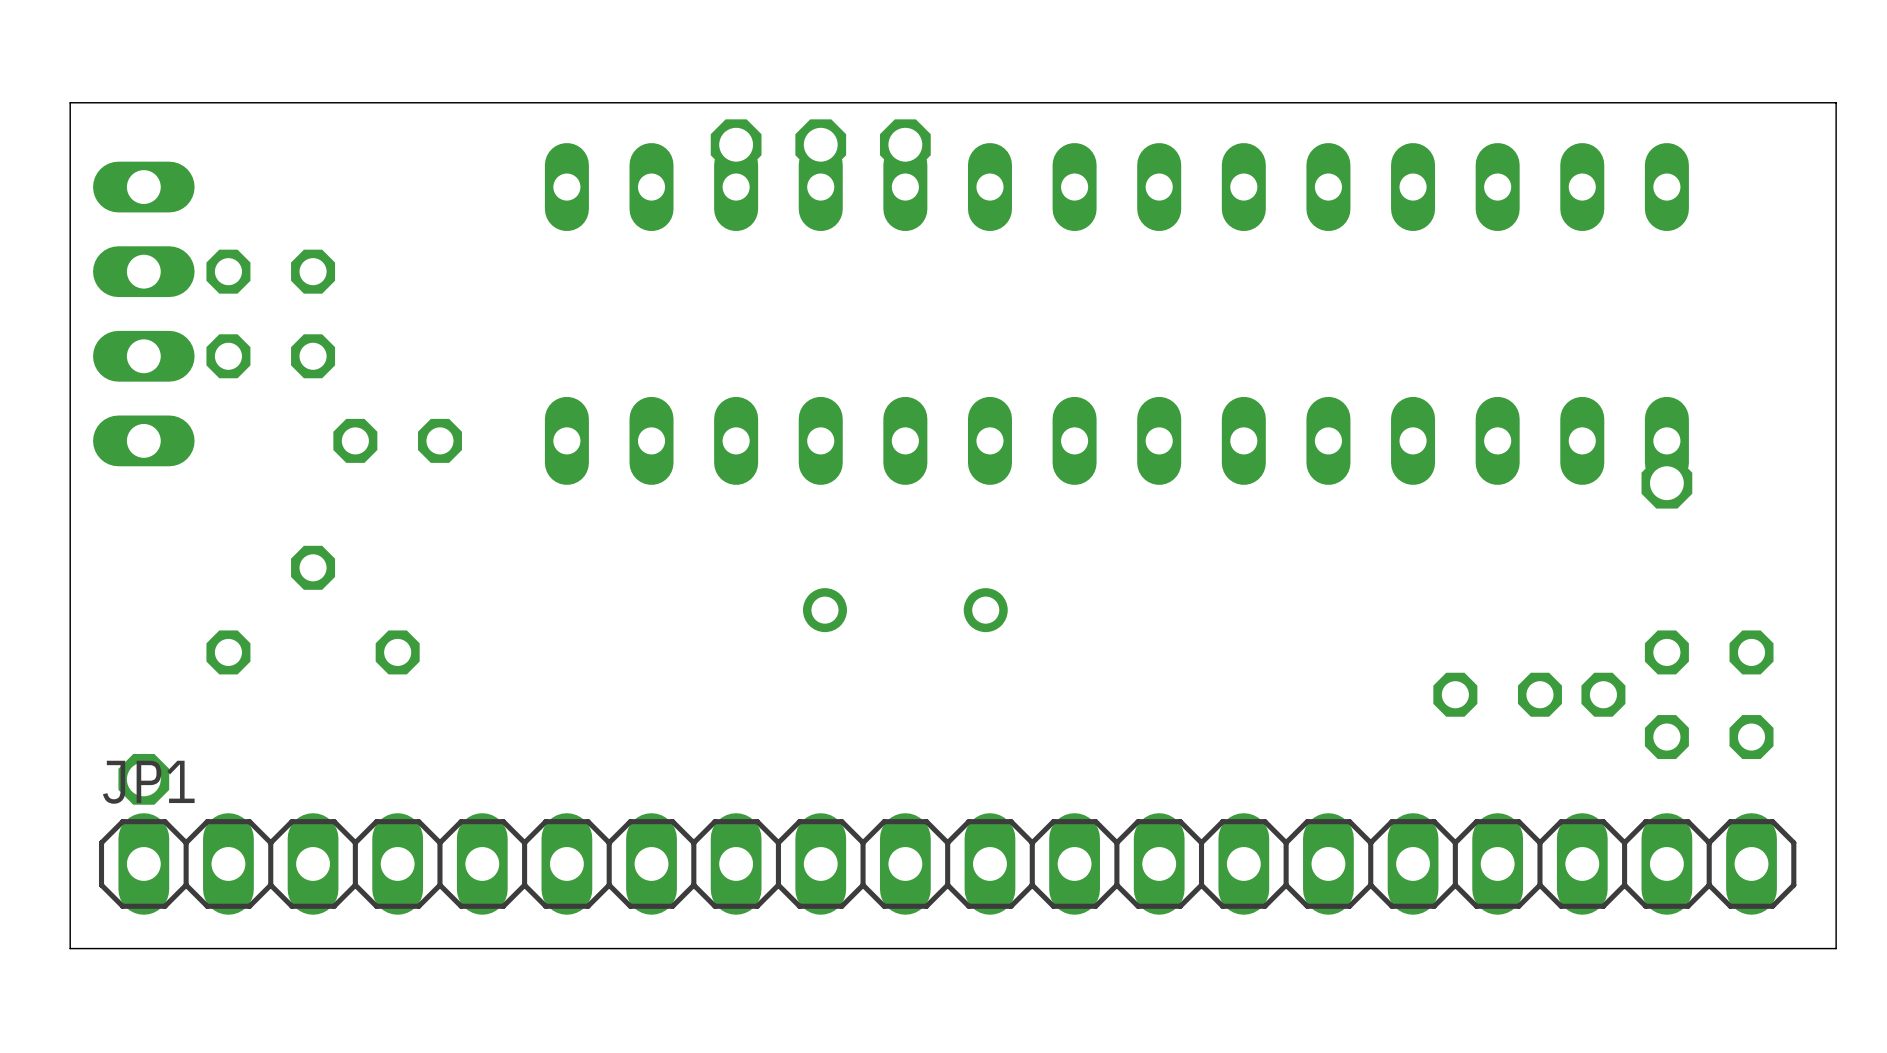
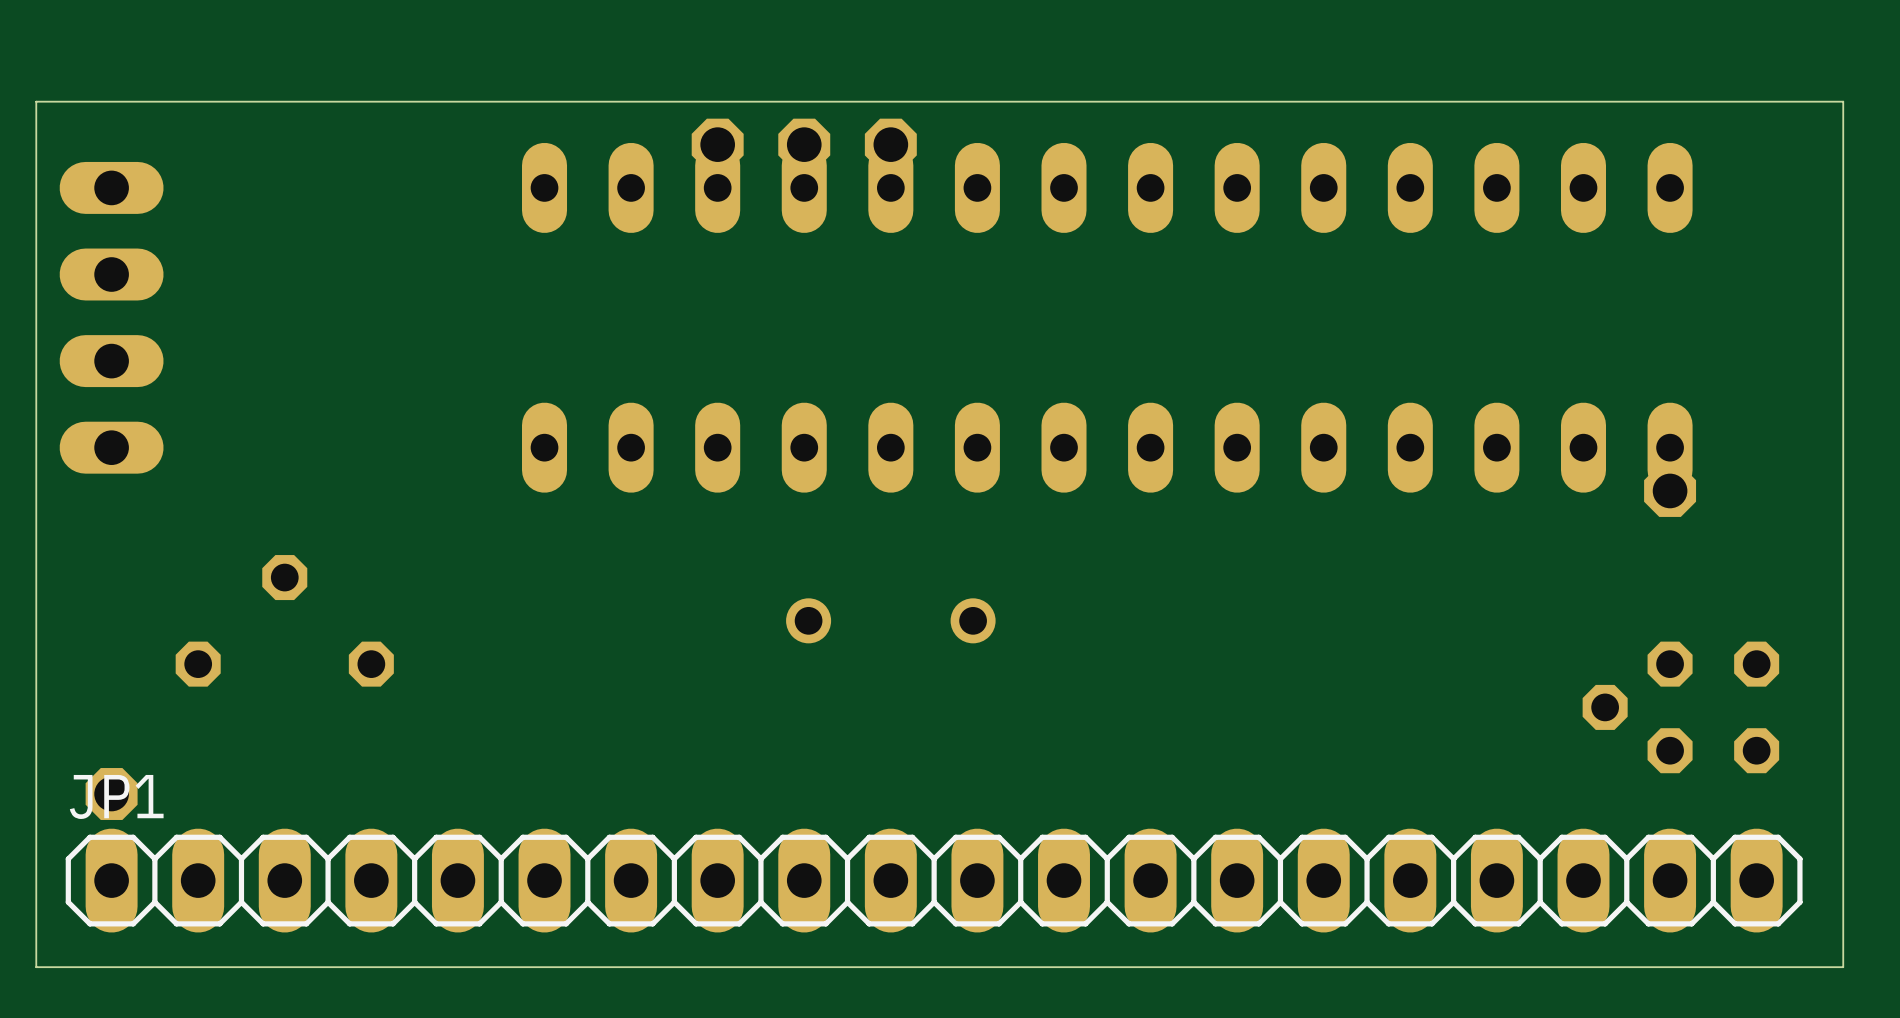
part: (270, 271) -> none
part: (270, 356) -> none
part: (397, 440) -> none
part: (1497, 694) -> none

